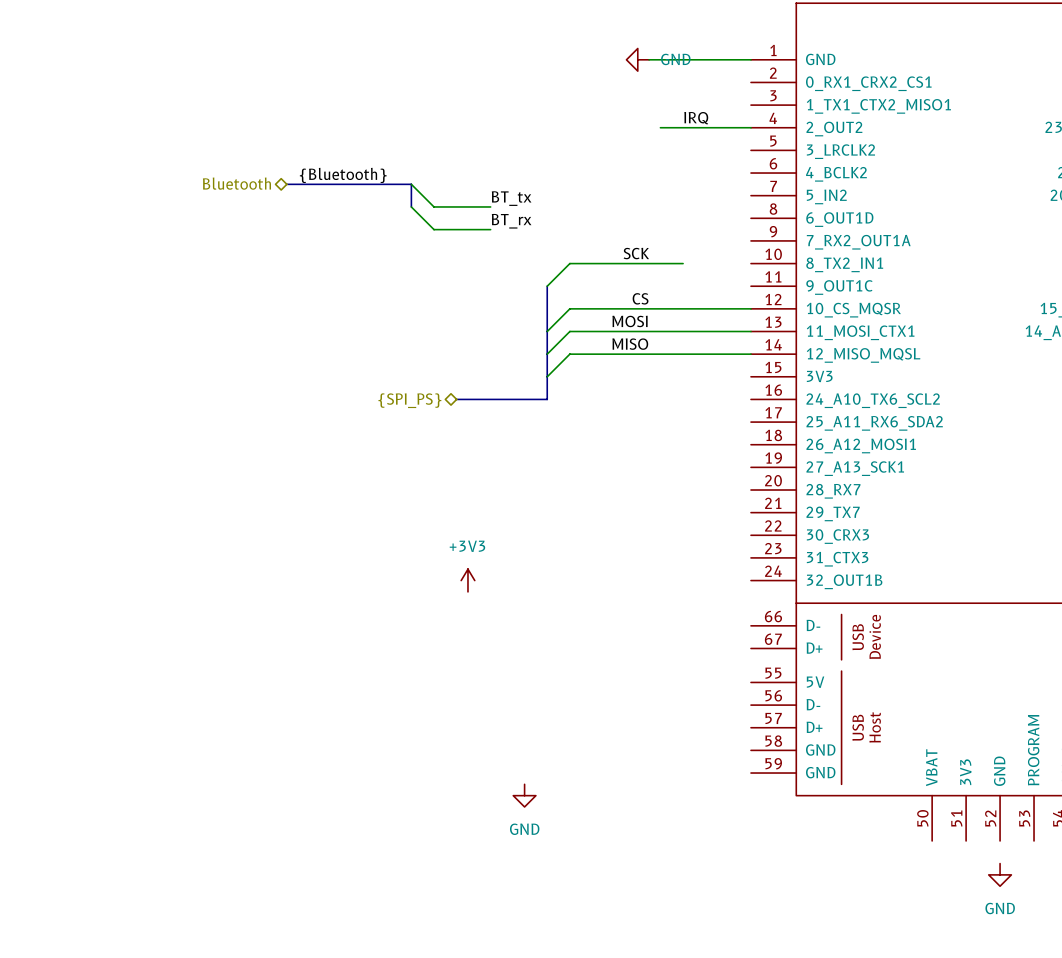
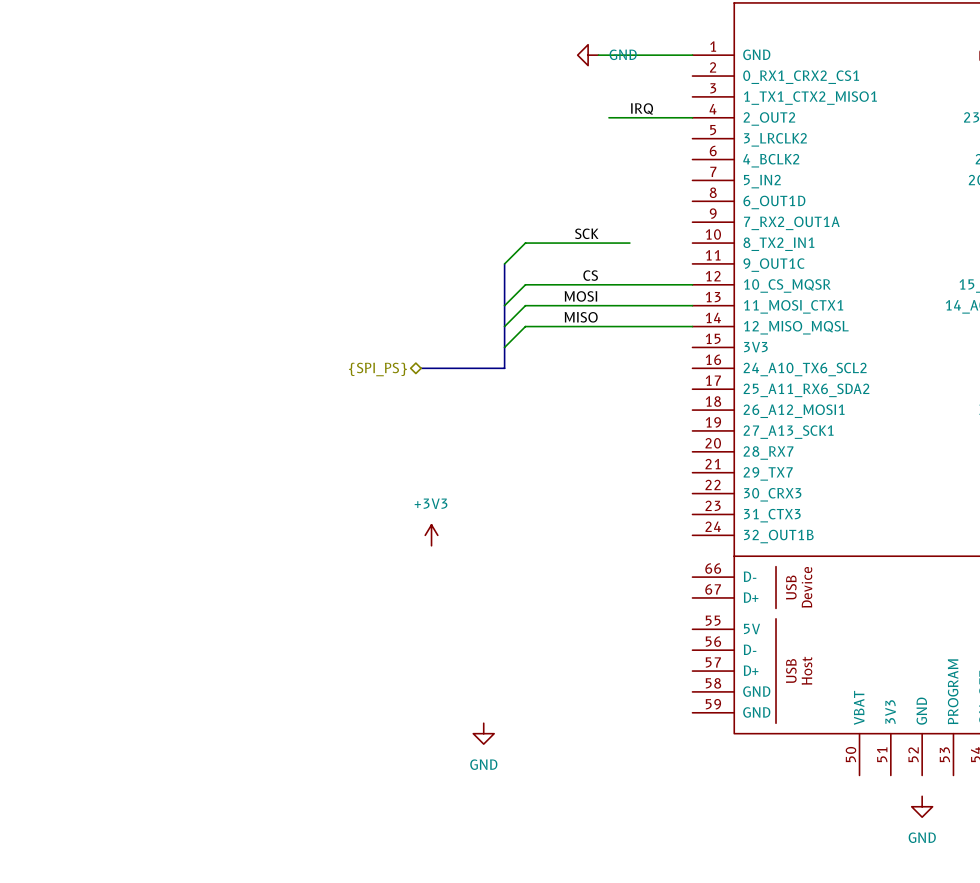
label: {Bluetooth} (343, 175) -> none
hierarchical label: Bluetooth (236, 183) -> none
bus: (286, 184) (411, 184) (411, 206) -> none
wire: (411, 184) (434, 206) (490, 206) -> none
label: BT_tx (511, 198) -> none
wire: (411, 206) (434, 229) (490, 229) -> none
label: BT_rx (511, 221) -> none

